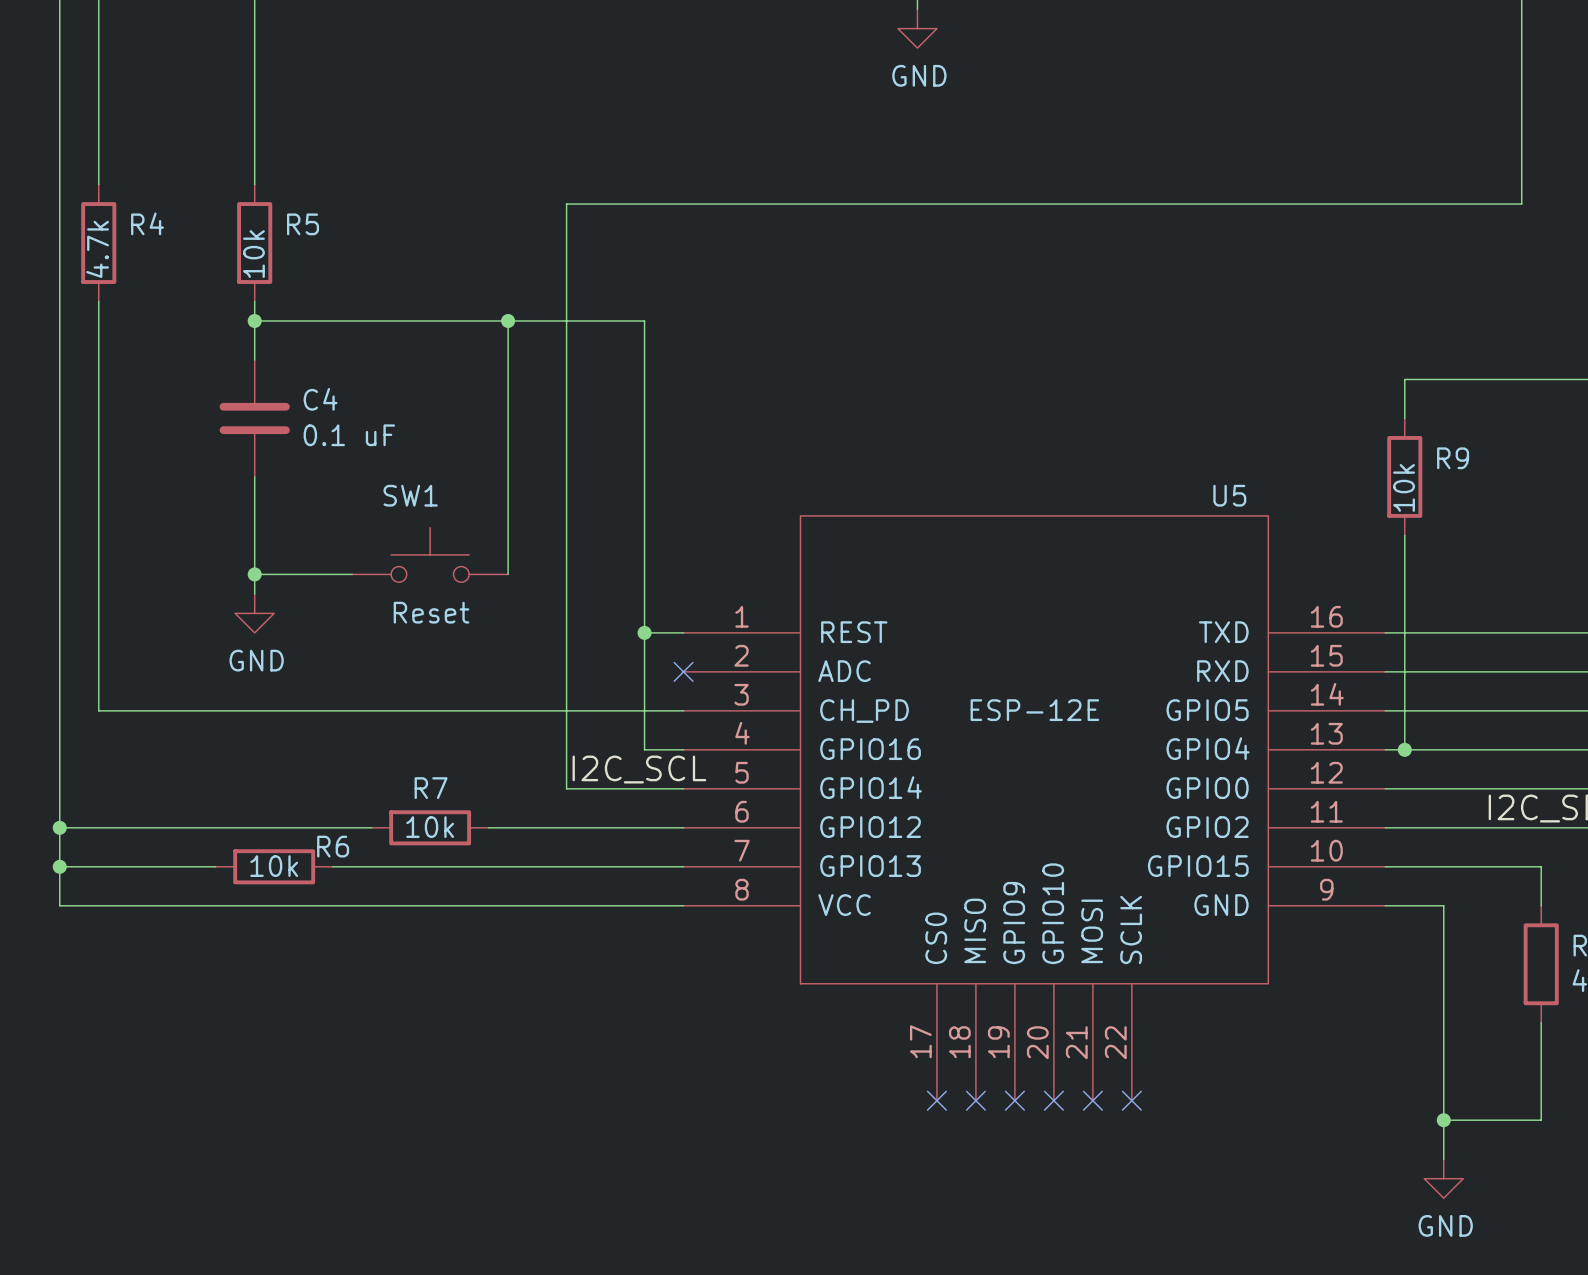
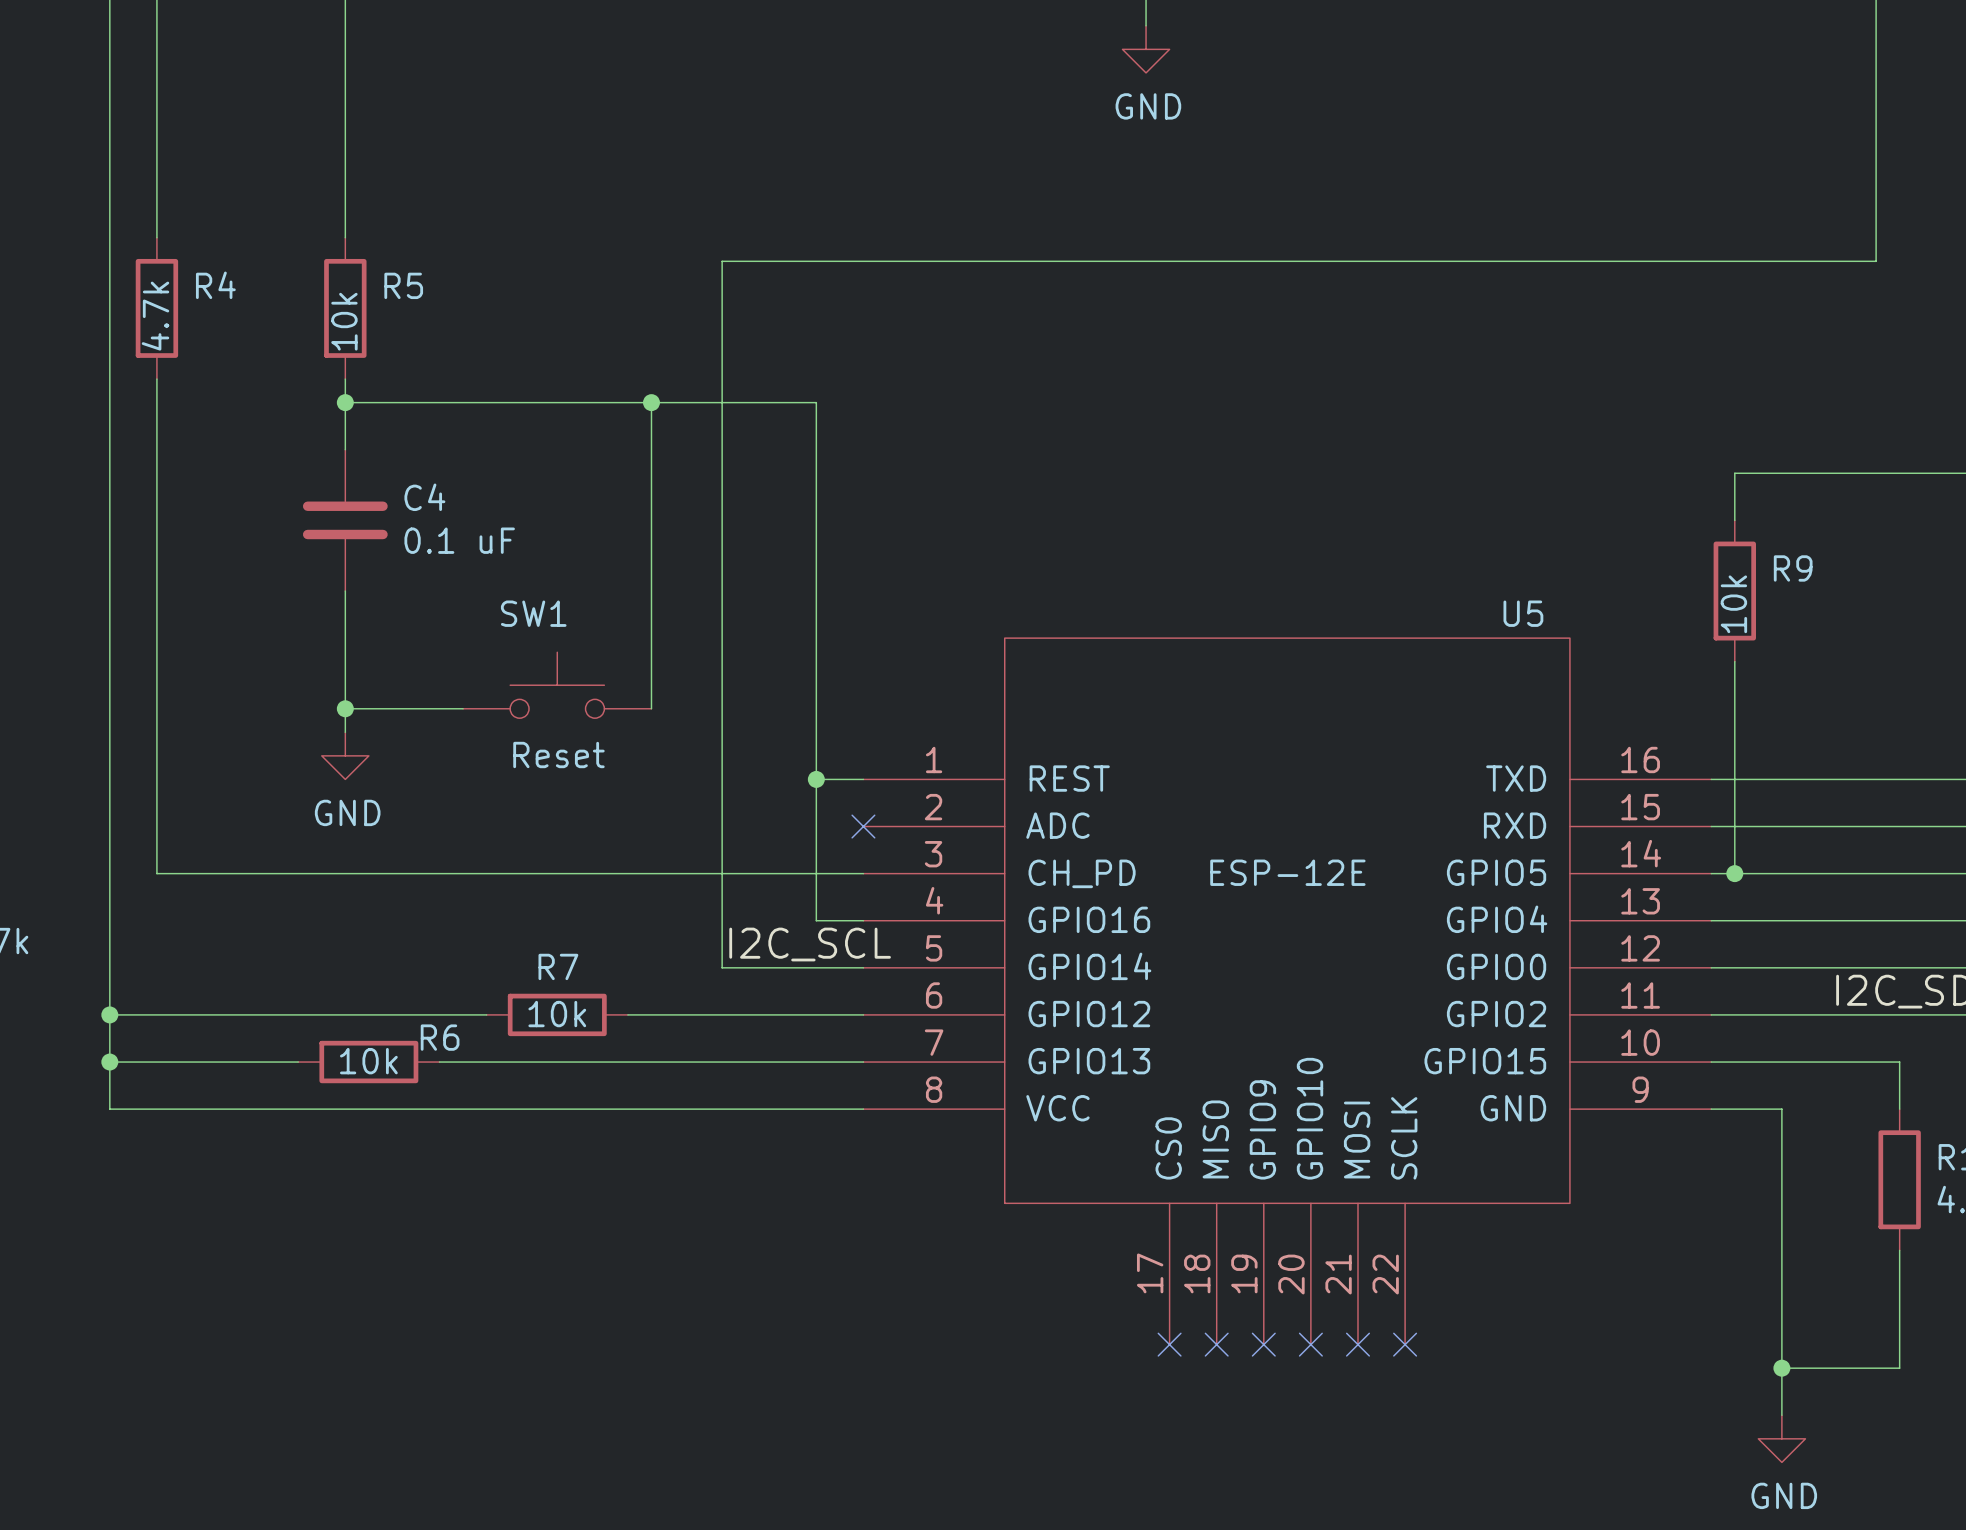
wire: (1404, 710) (1404, 749) -> none
junction position: (1404, 749) -> (1734, 873)

